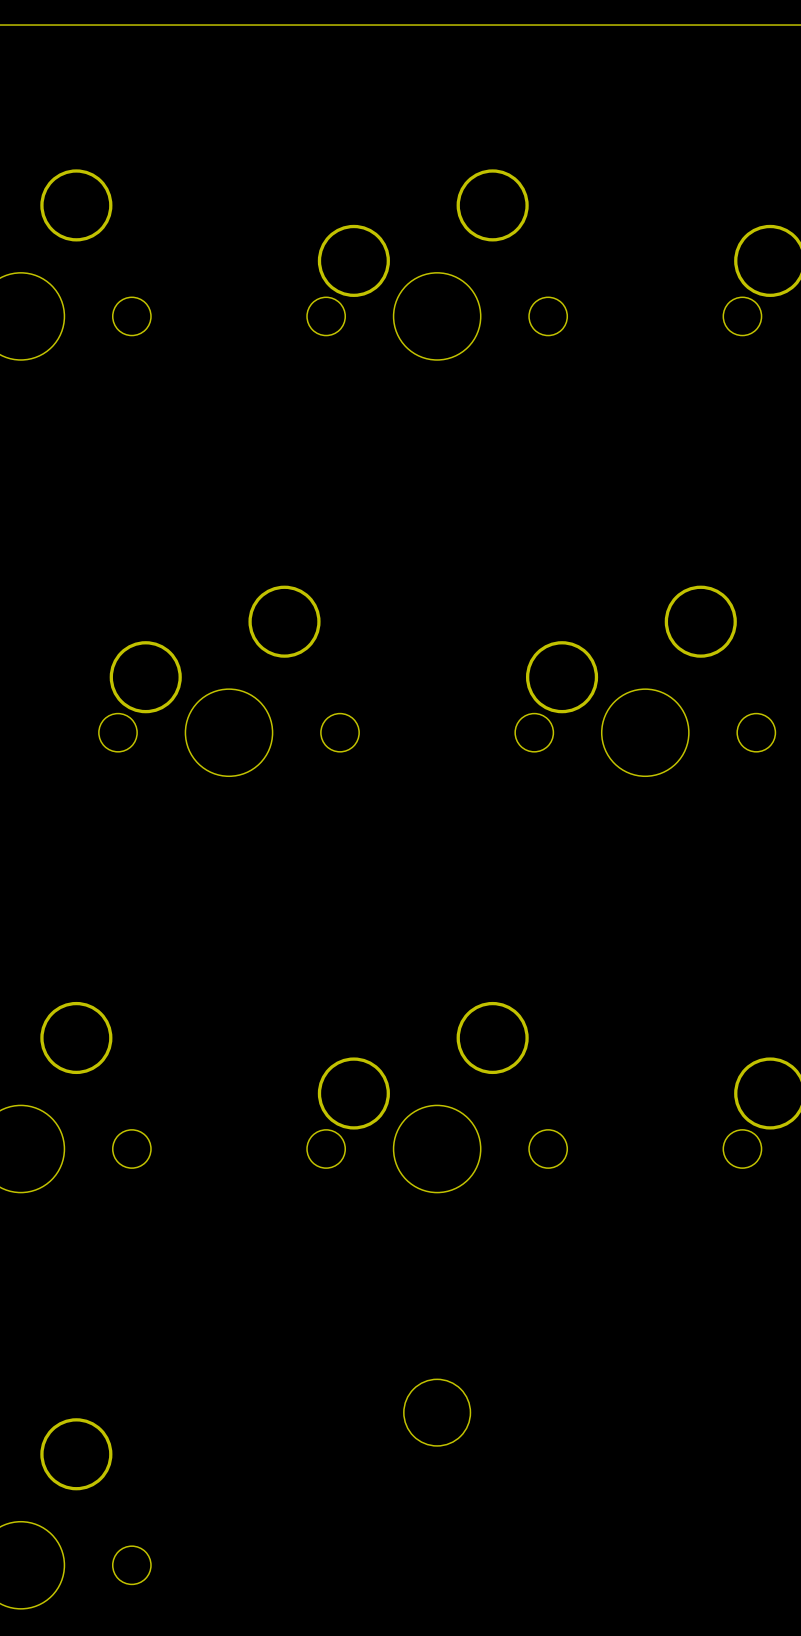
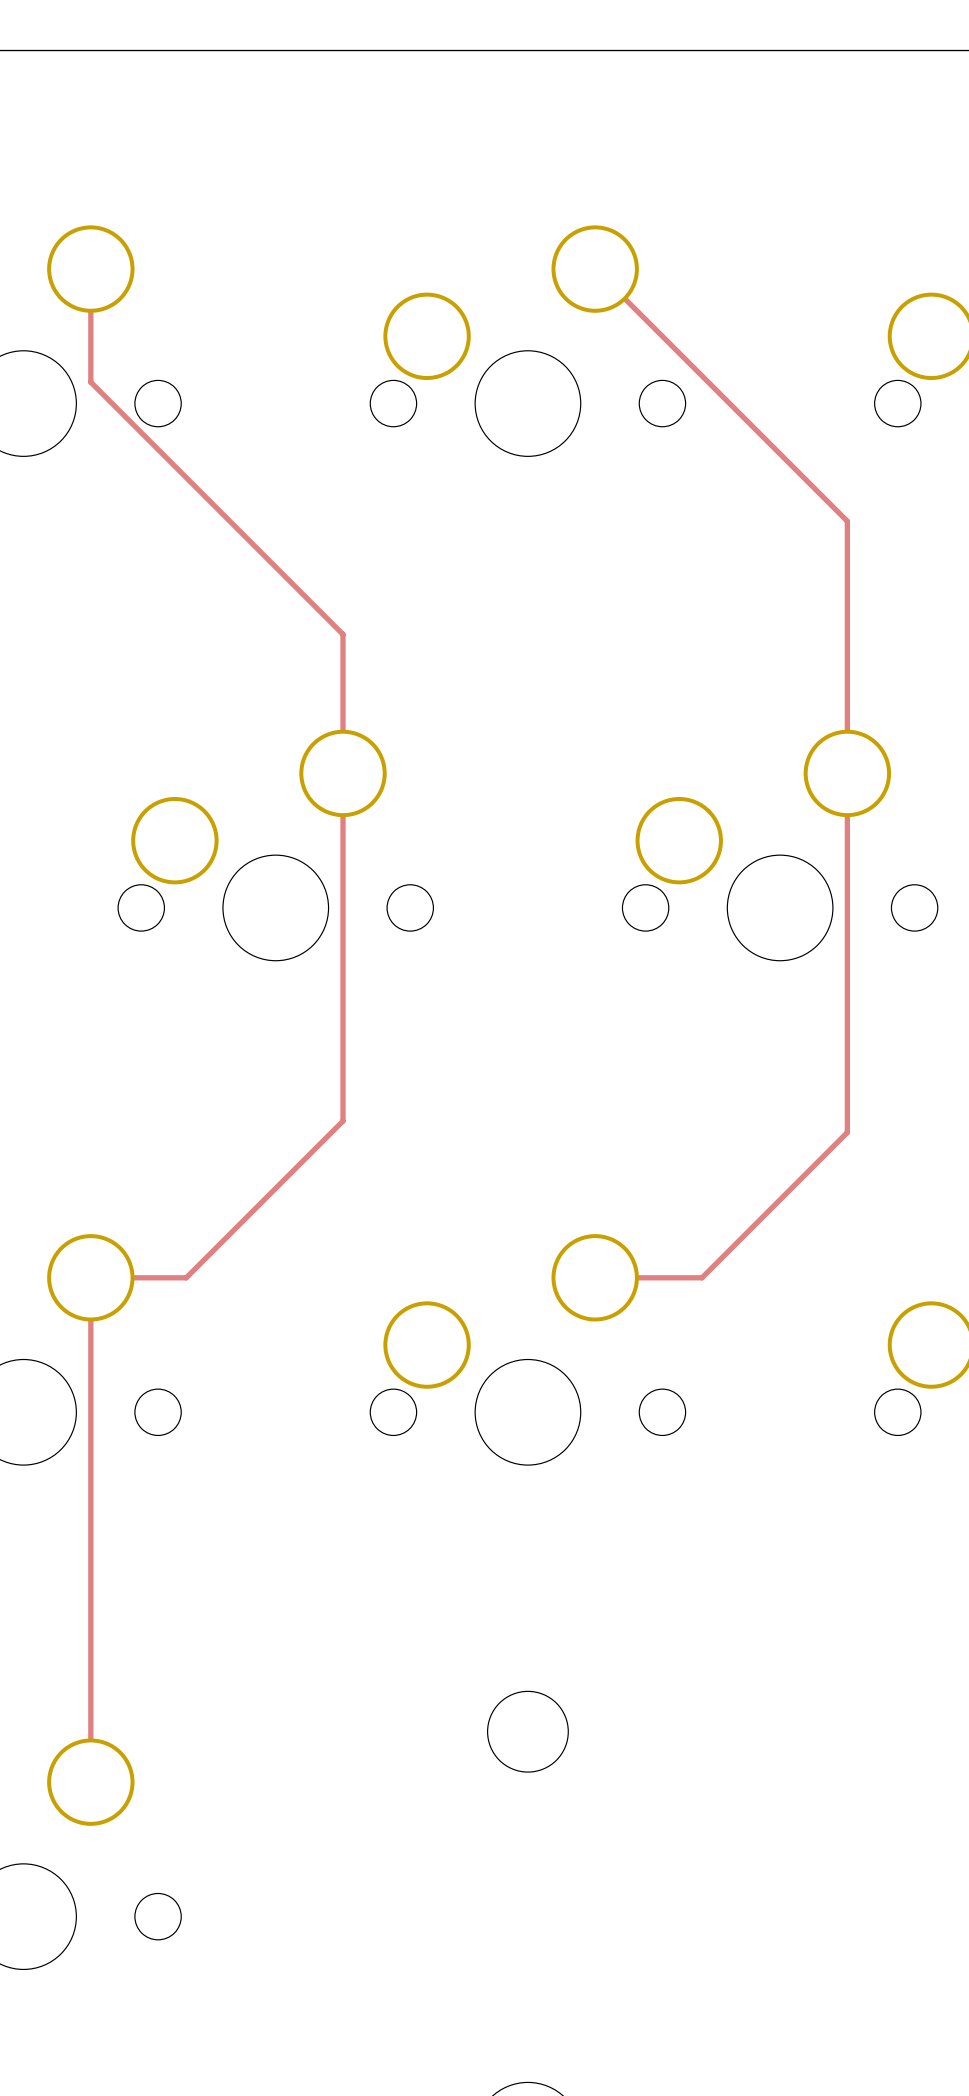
track: none -> (90, 269) (90, 382) (343, 634) (343, 1121) (186, 1277) (90, 1277) (90, 1782)
track: none -> (595, 269) (847, 521) (847, 1132) (702, 1277) (595, 1277)

